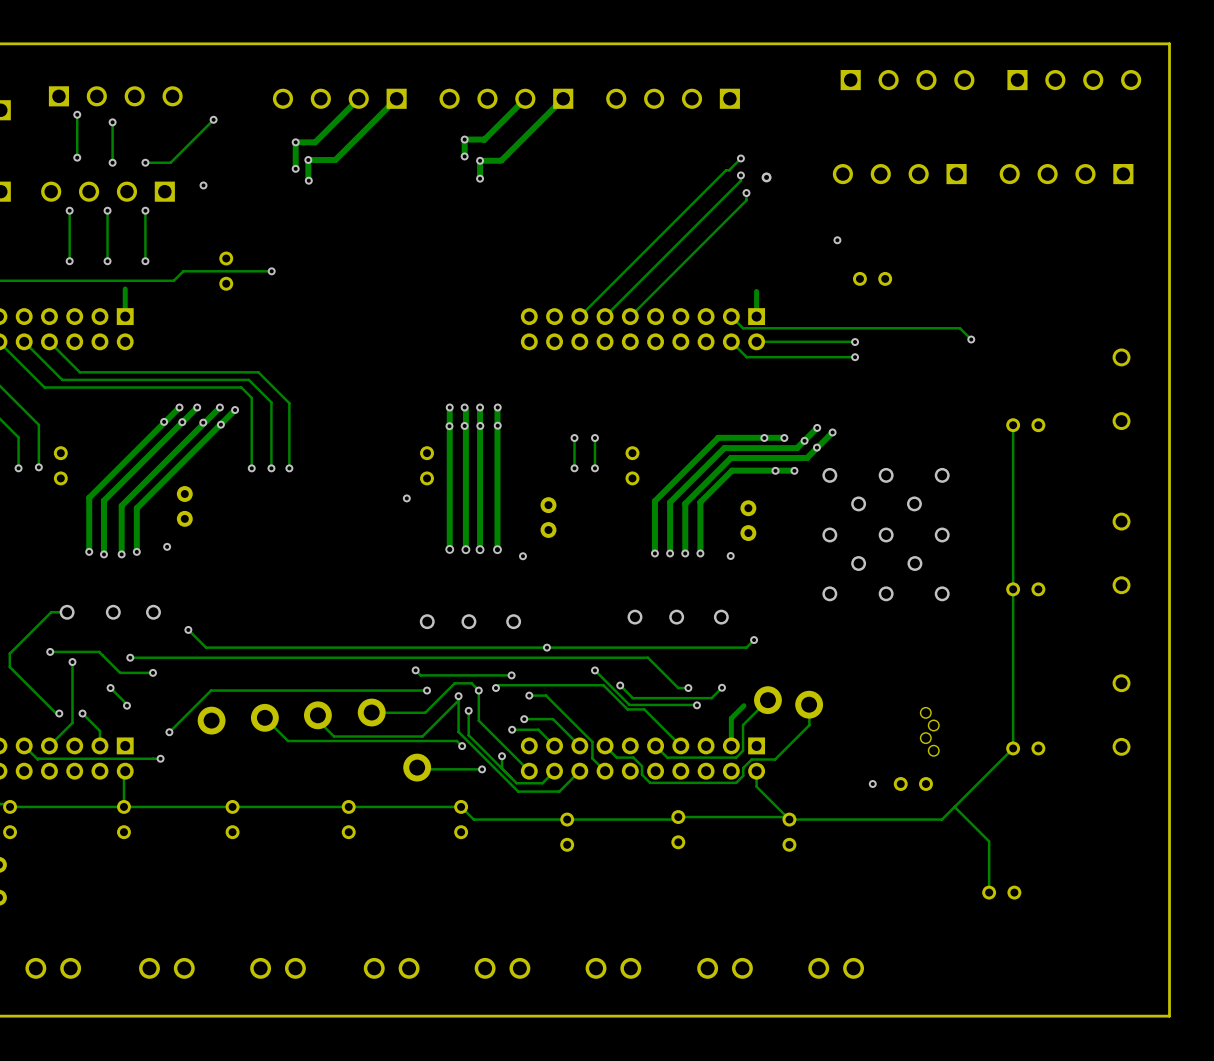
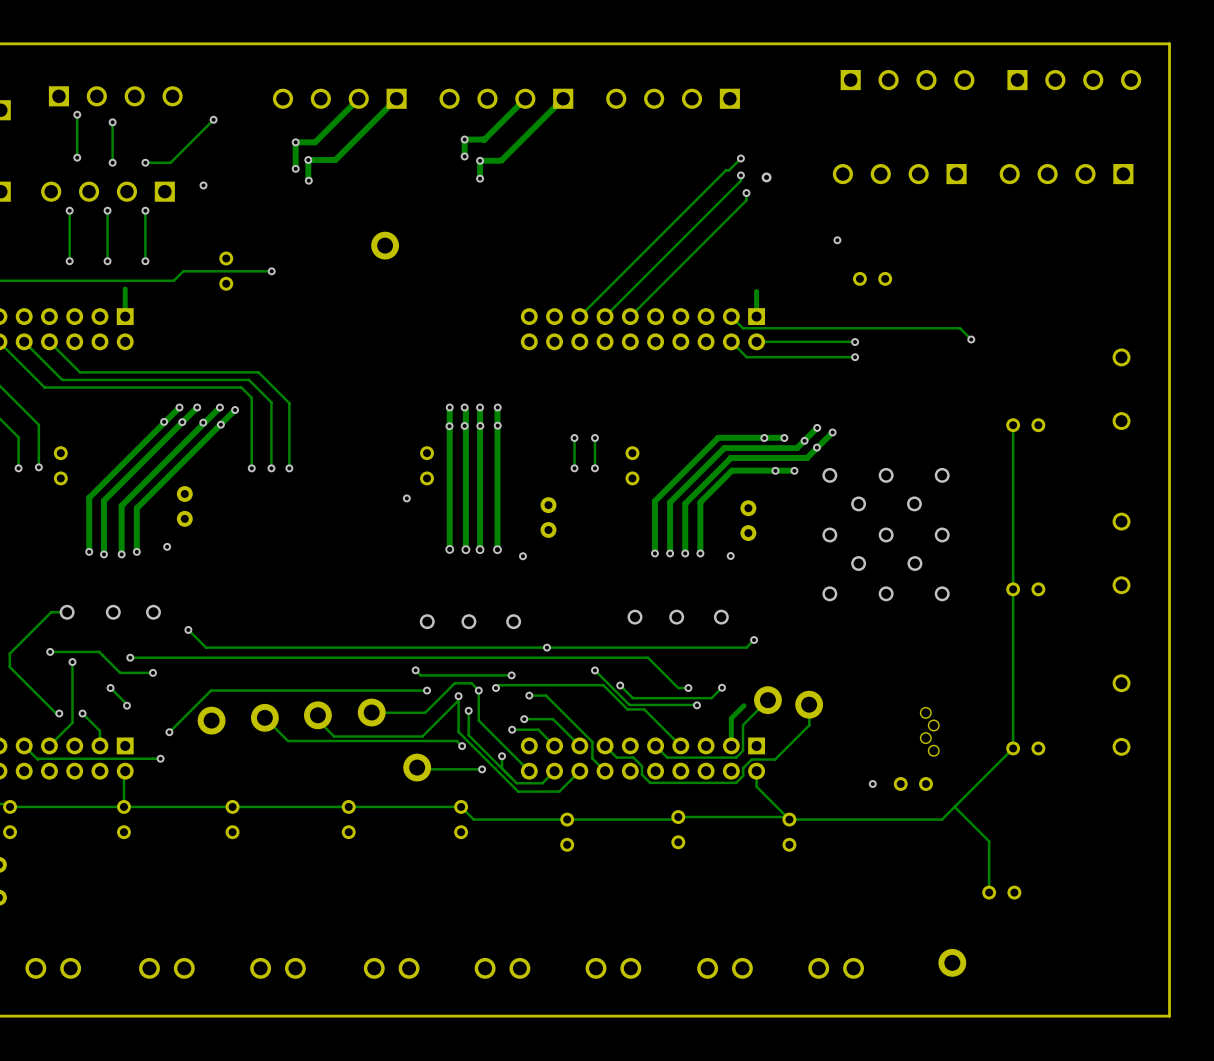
part: none -> (385, 245)
part: none -> (952, 962)

